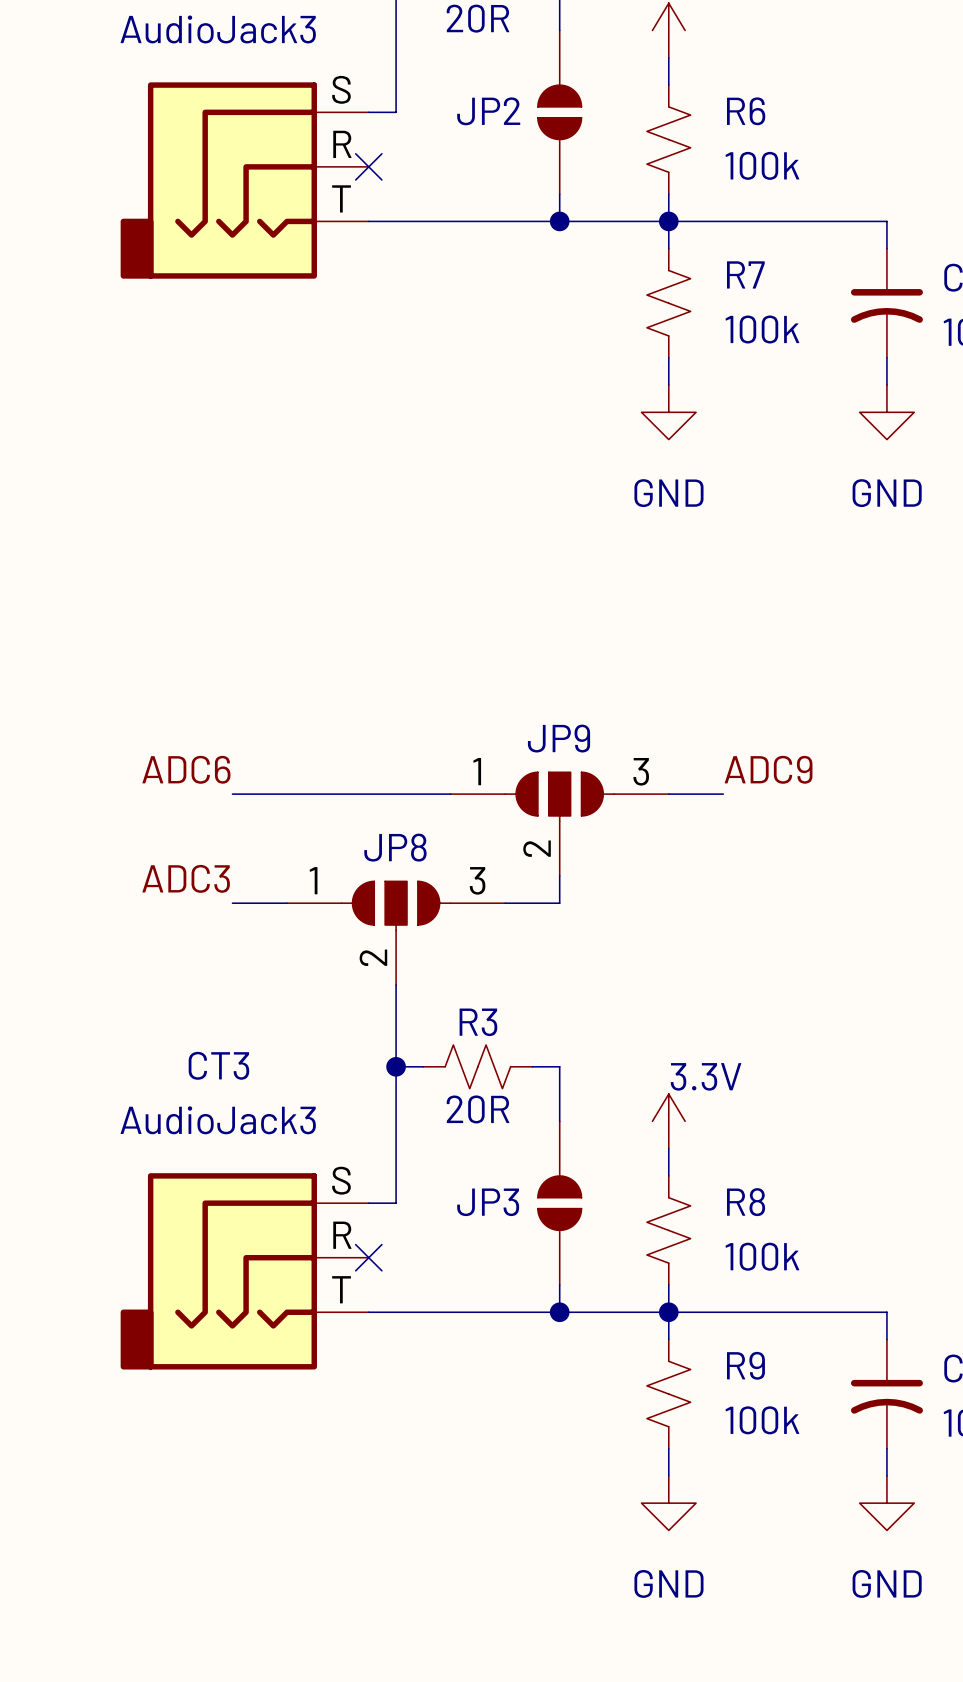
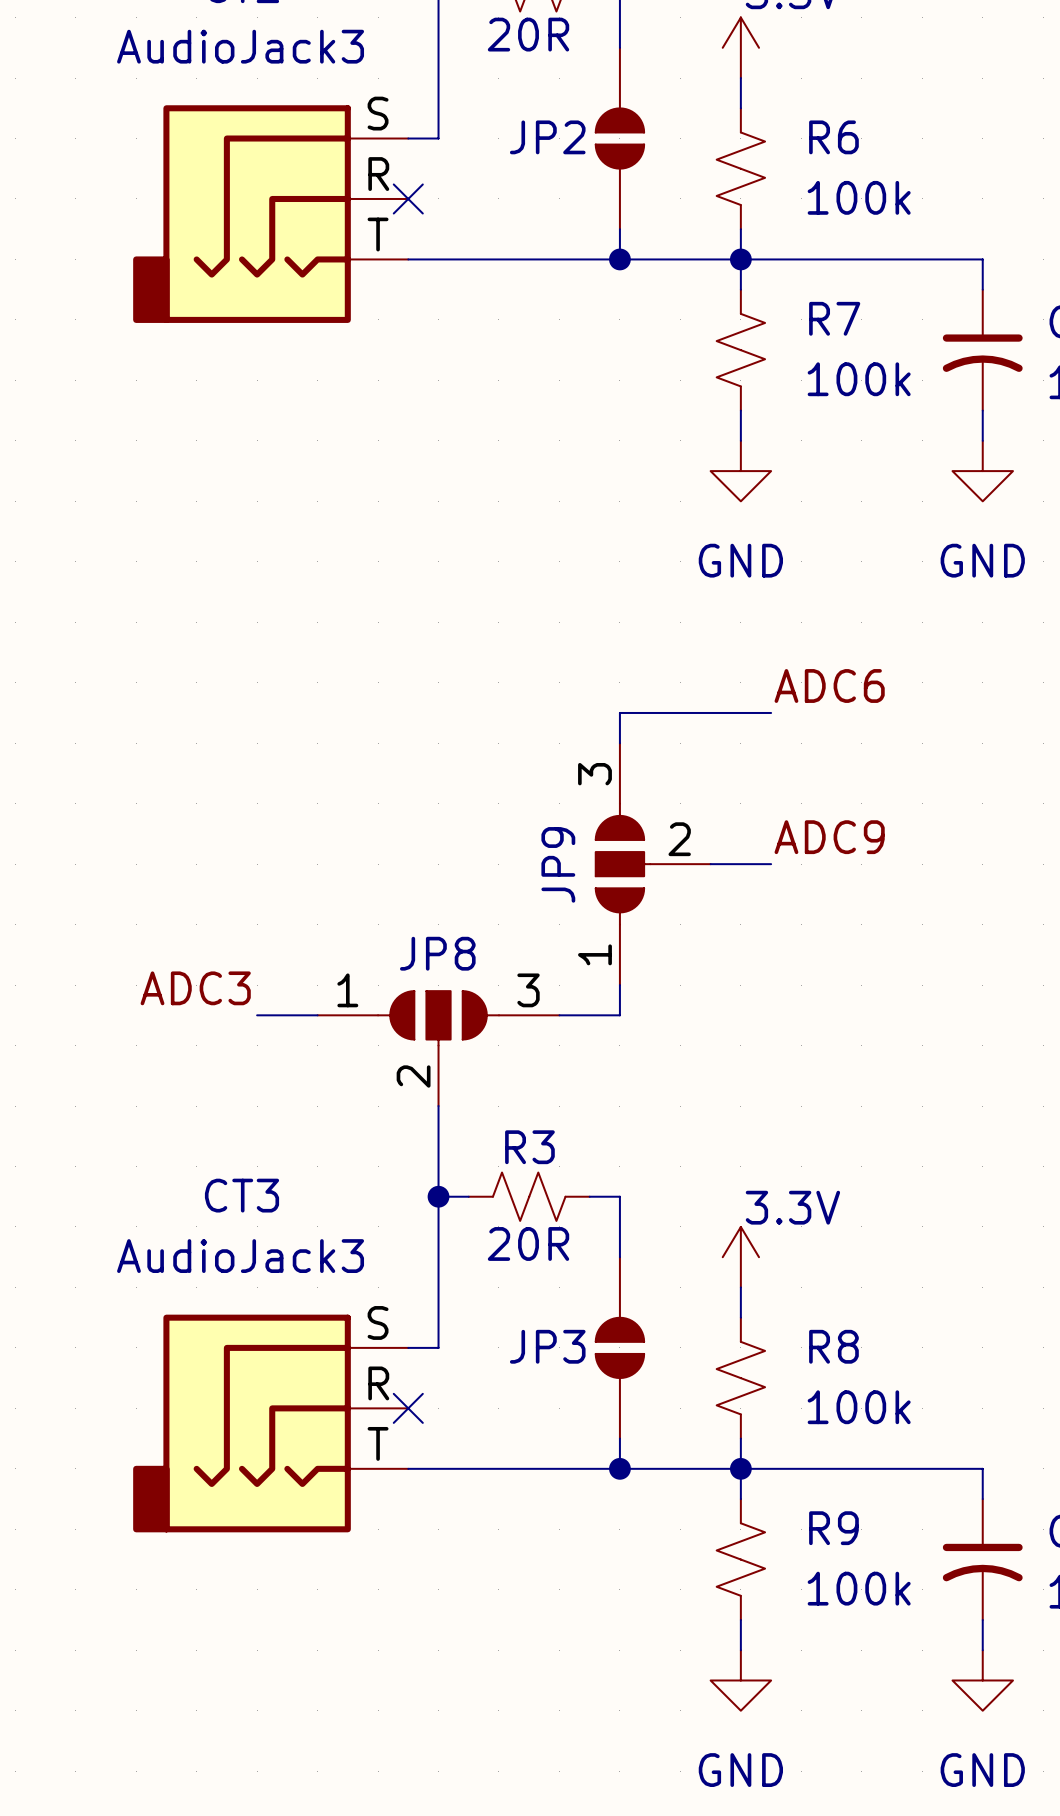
wire: none -> (771, 712) (619, 712) (619, 743)
label position: ADC6 (186, 769) -> ADC6 (829, 685)
label position: ADC9 (768, 769) -> ADC9 (829, 837)
wire: (232, 794) (450, 794) -> none
wire: (668, 794) (723, 794) -> (710, 864) (771, 864)
JP9 rotation: 0° (559, 796) -> 90° counterclockwise (622, 864)

